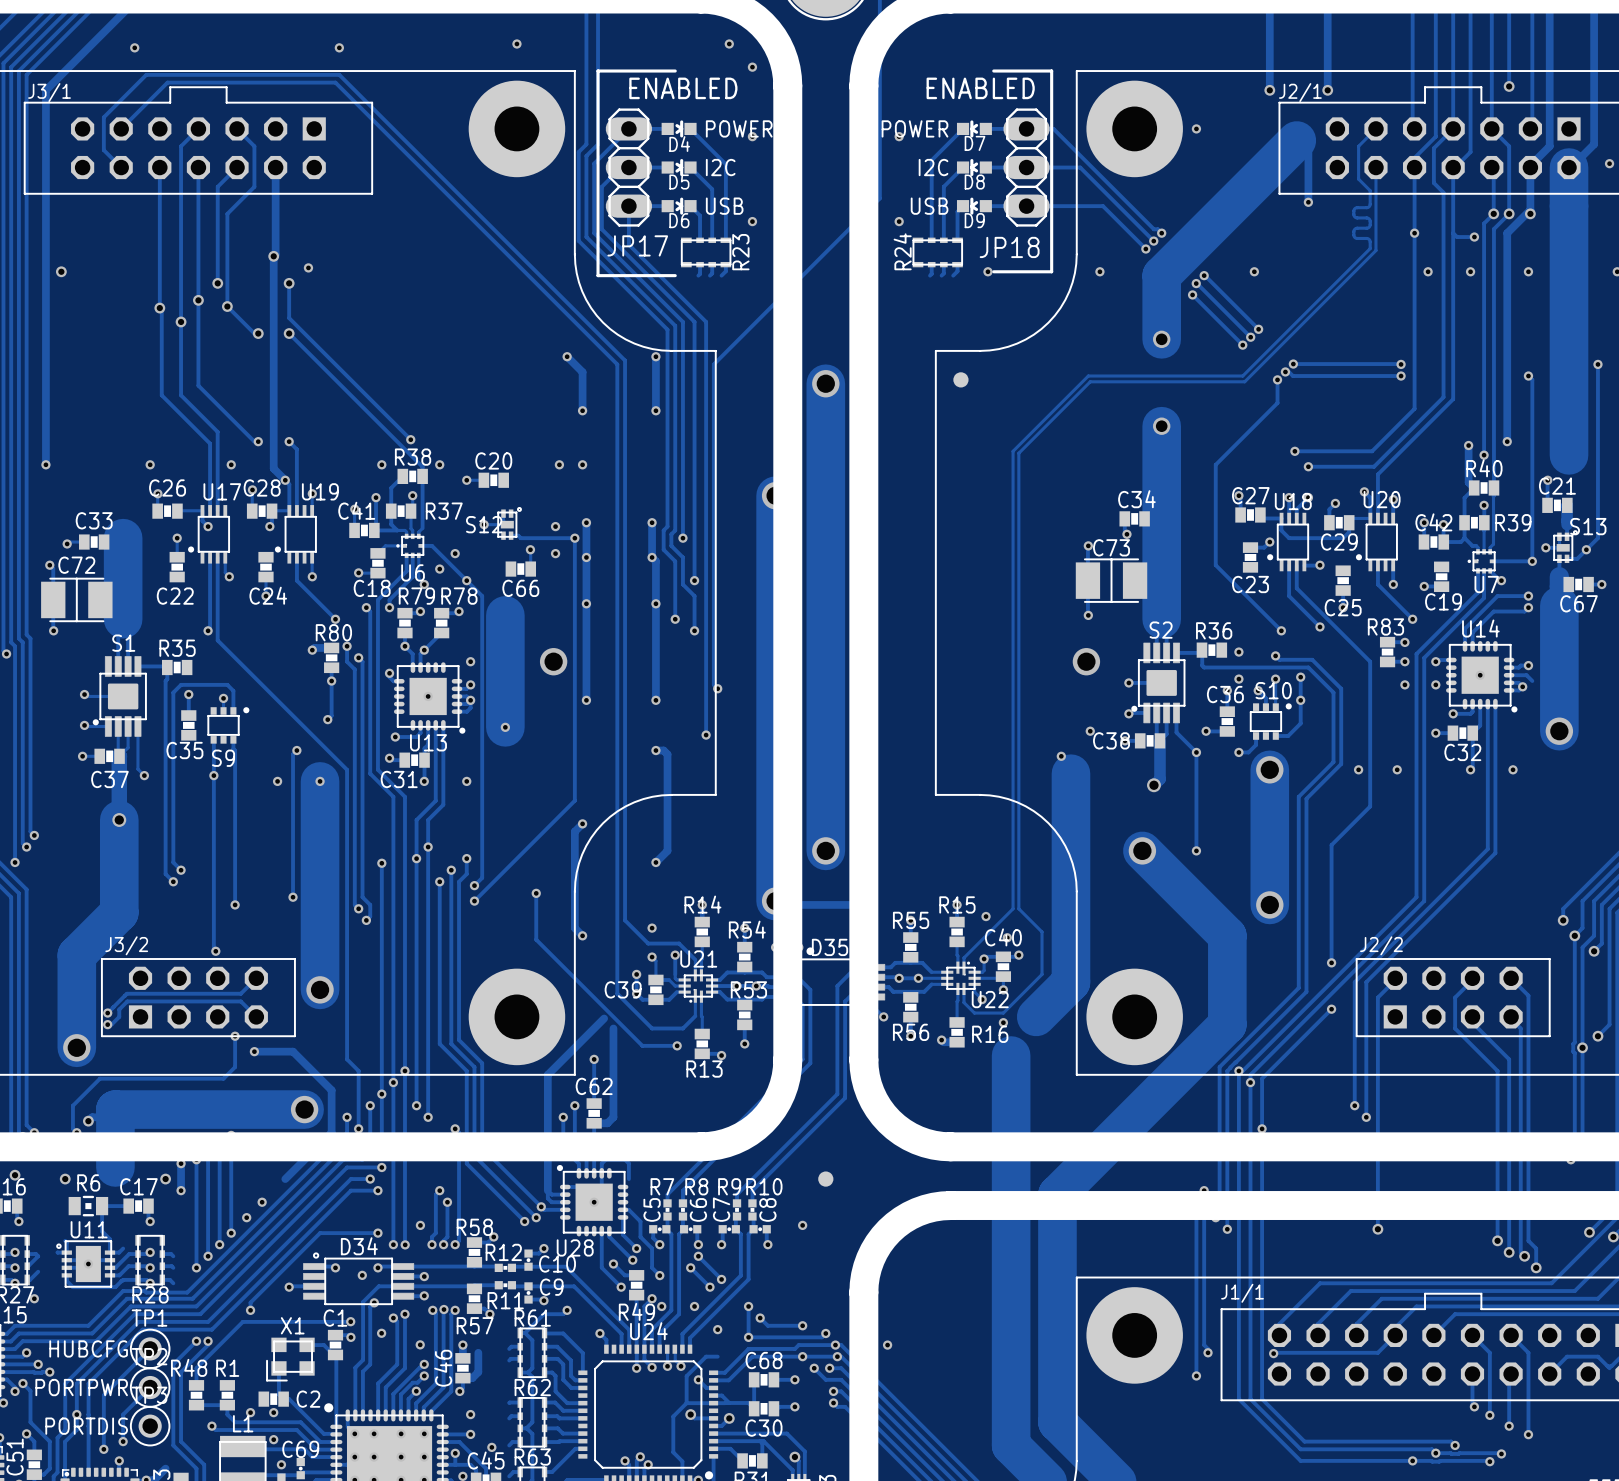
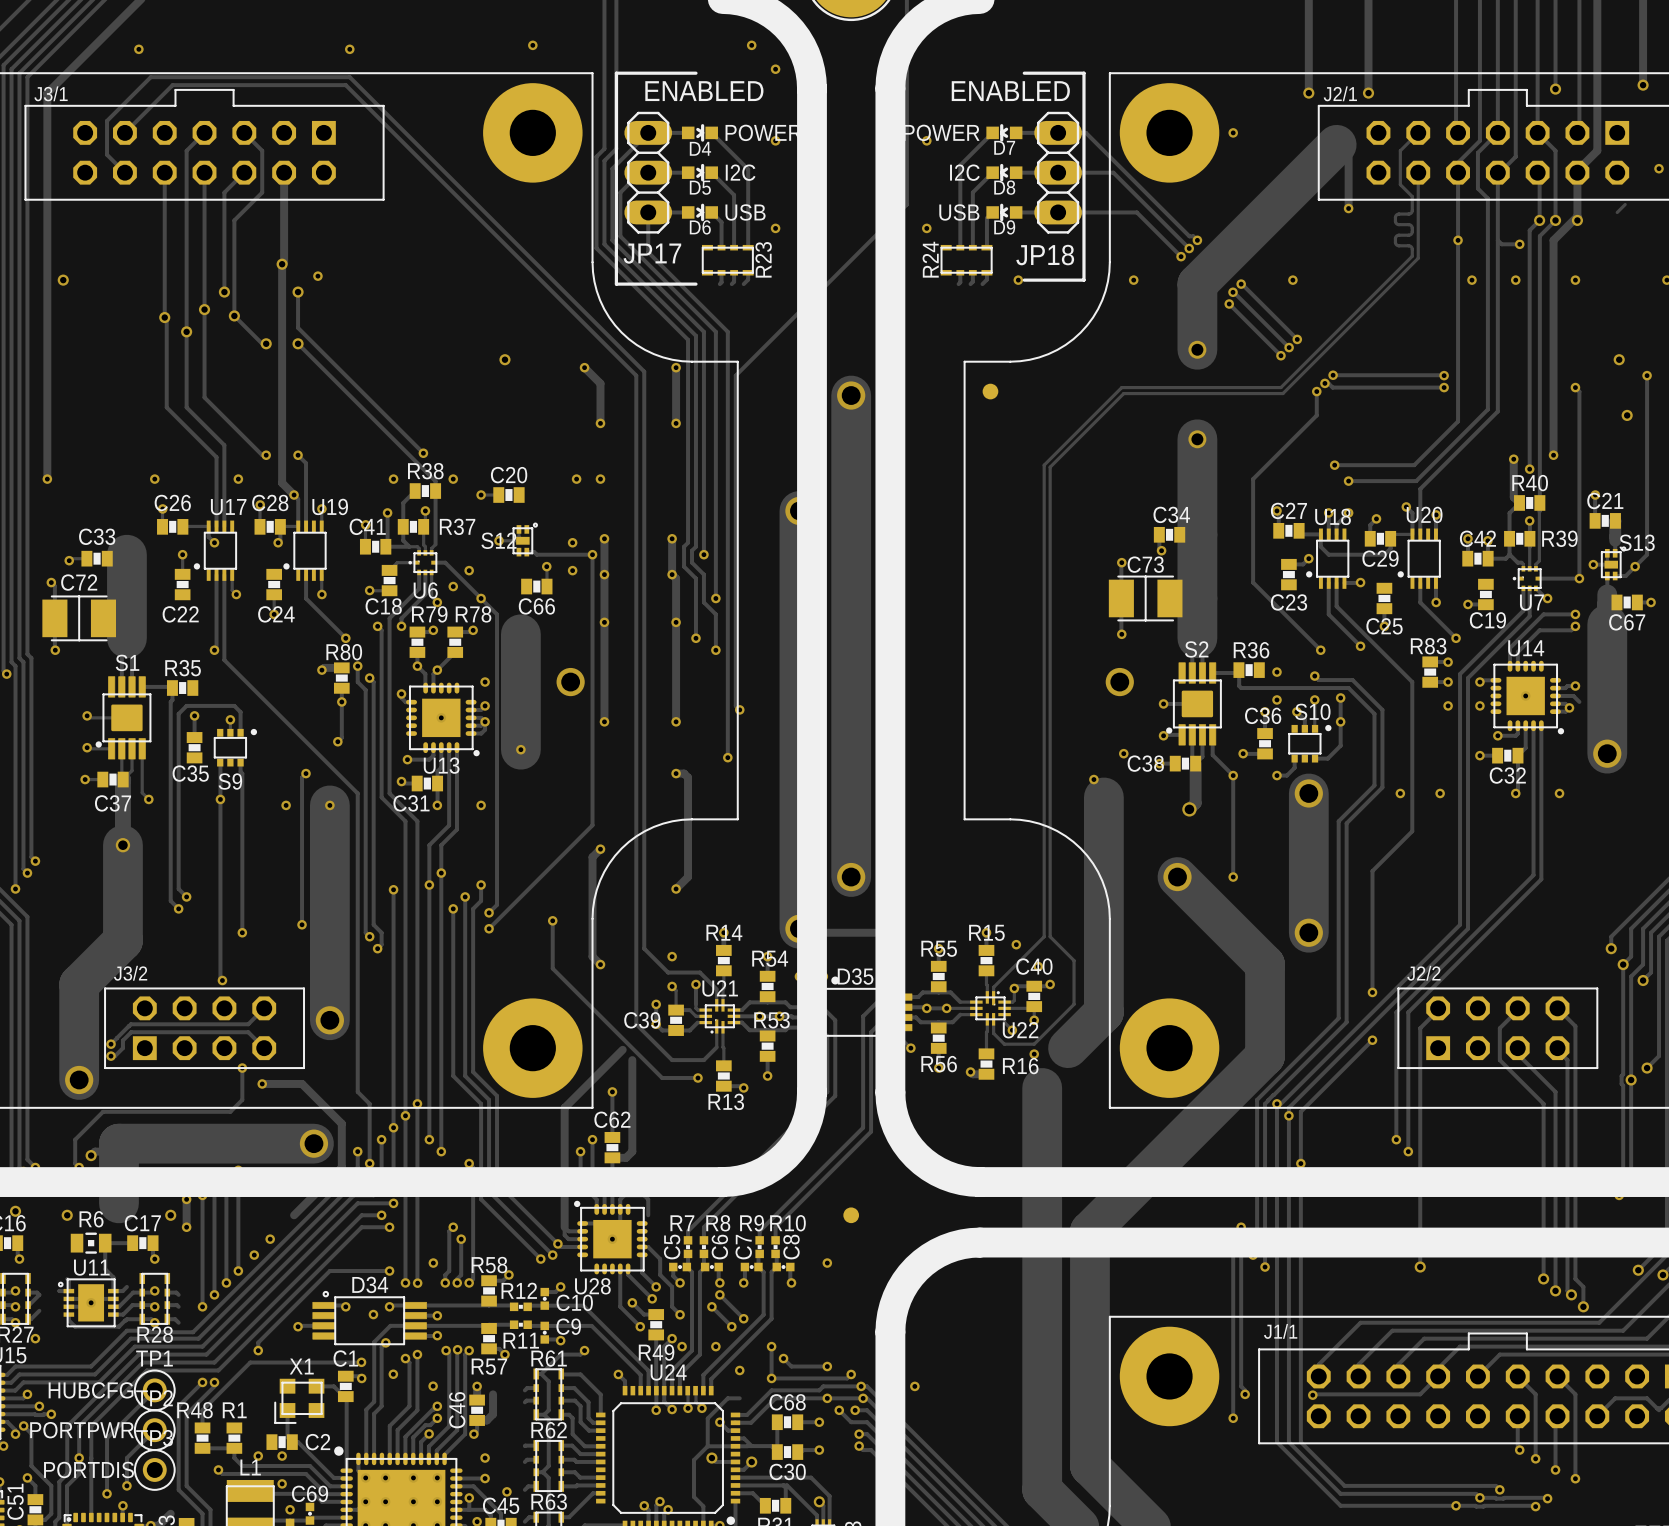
track: (1594, 82) (1594, 144) (1569, 167) (1569, 455) -> none
via: none -> (1643, 85)
via: none -> (504, 359)
via: none -> (1619, 359)
via: none -> (1627, 415)

